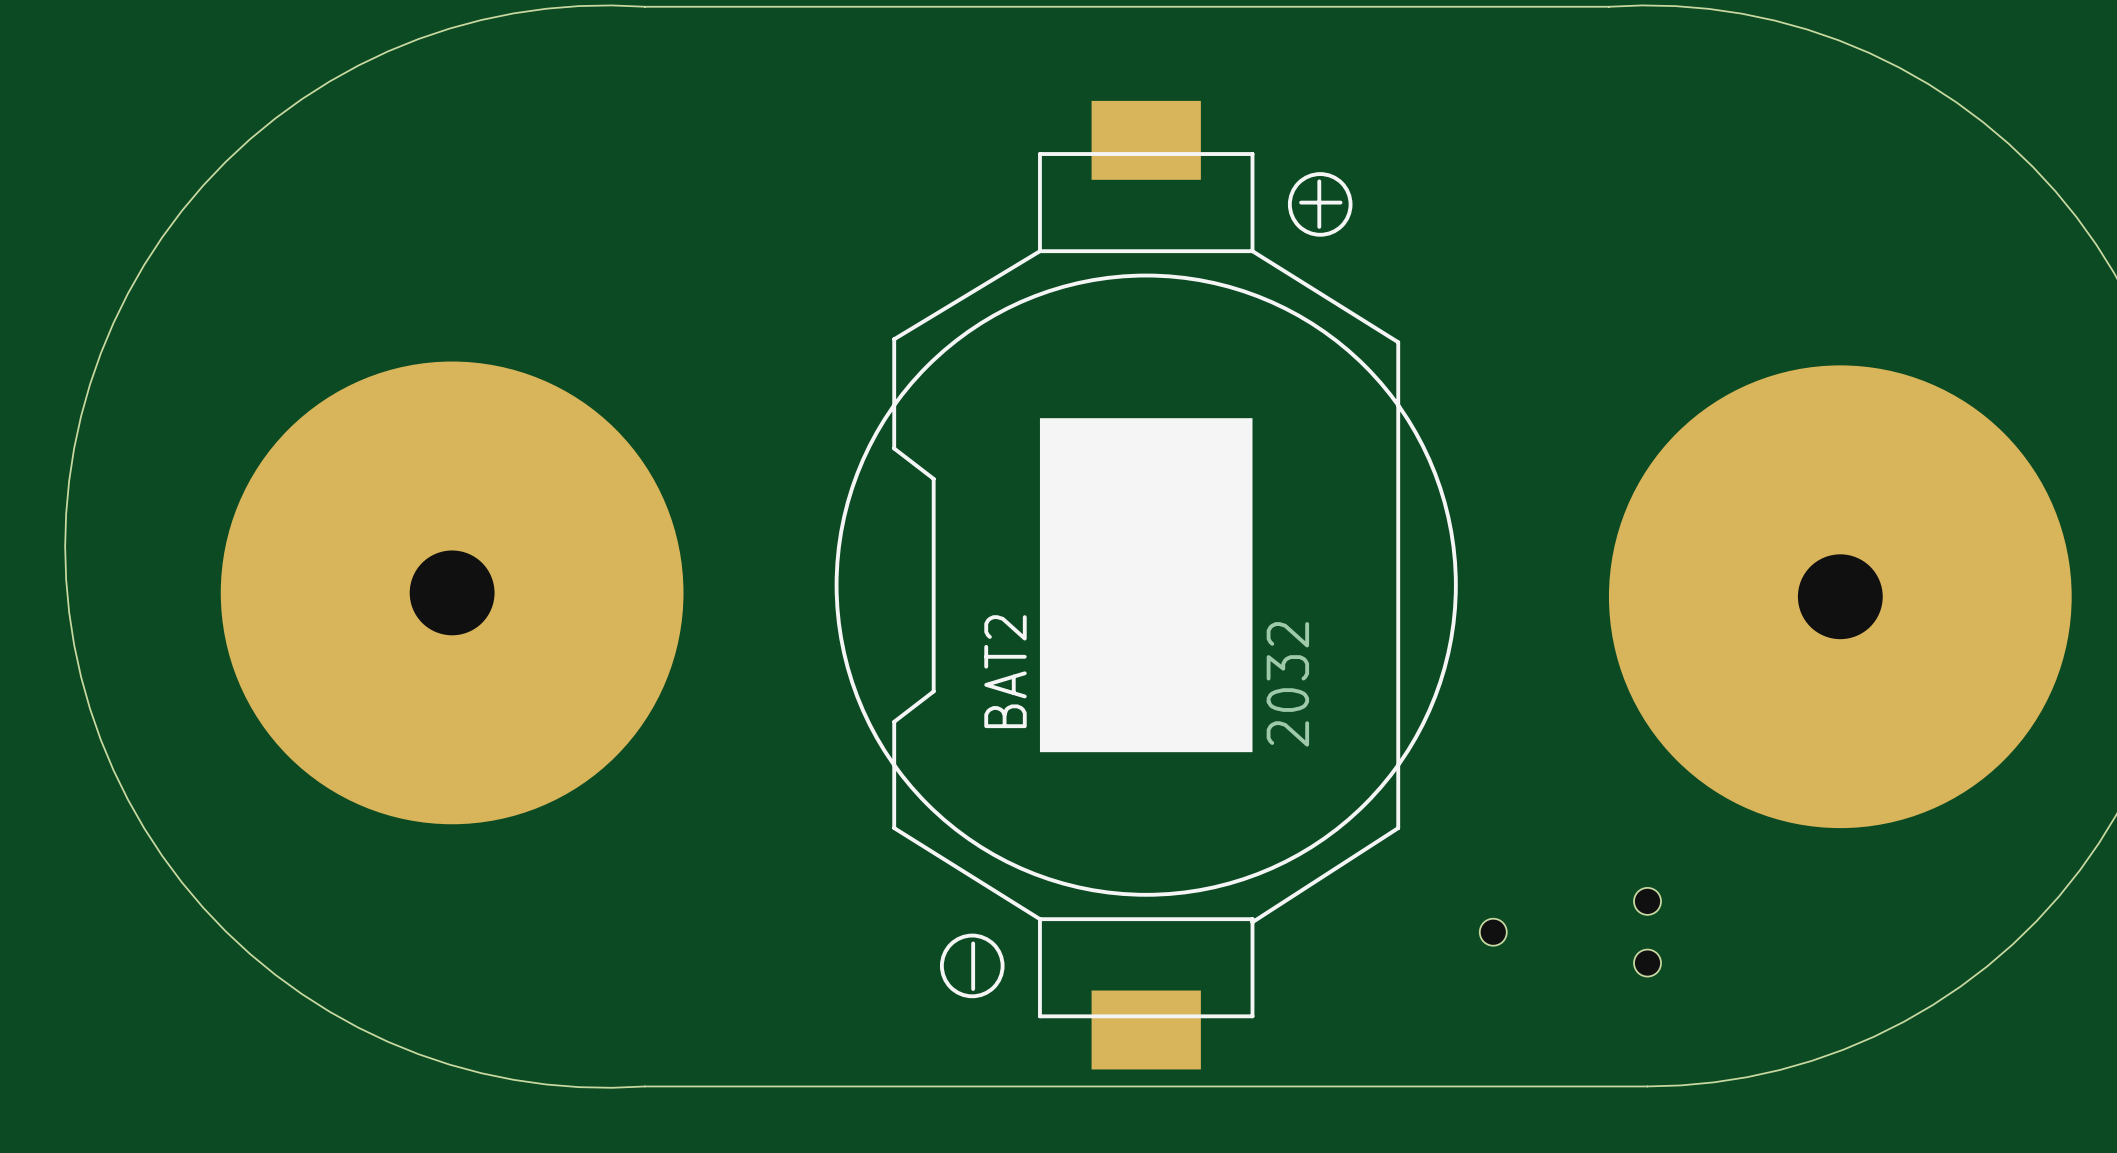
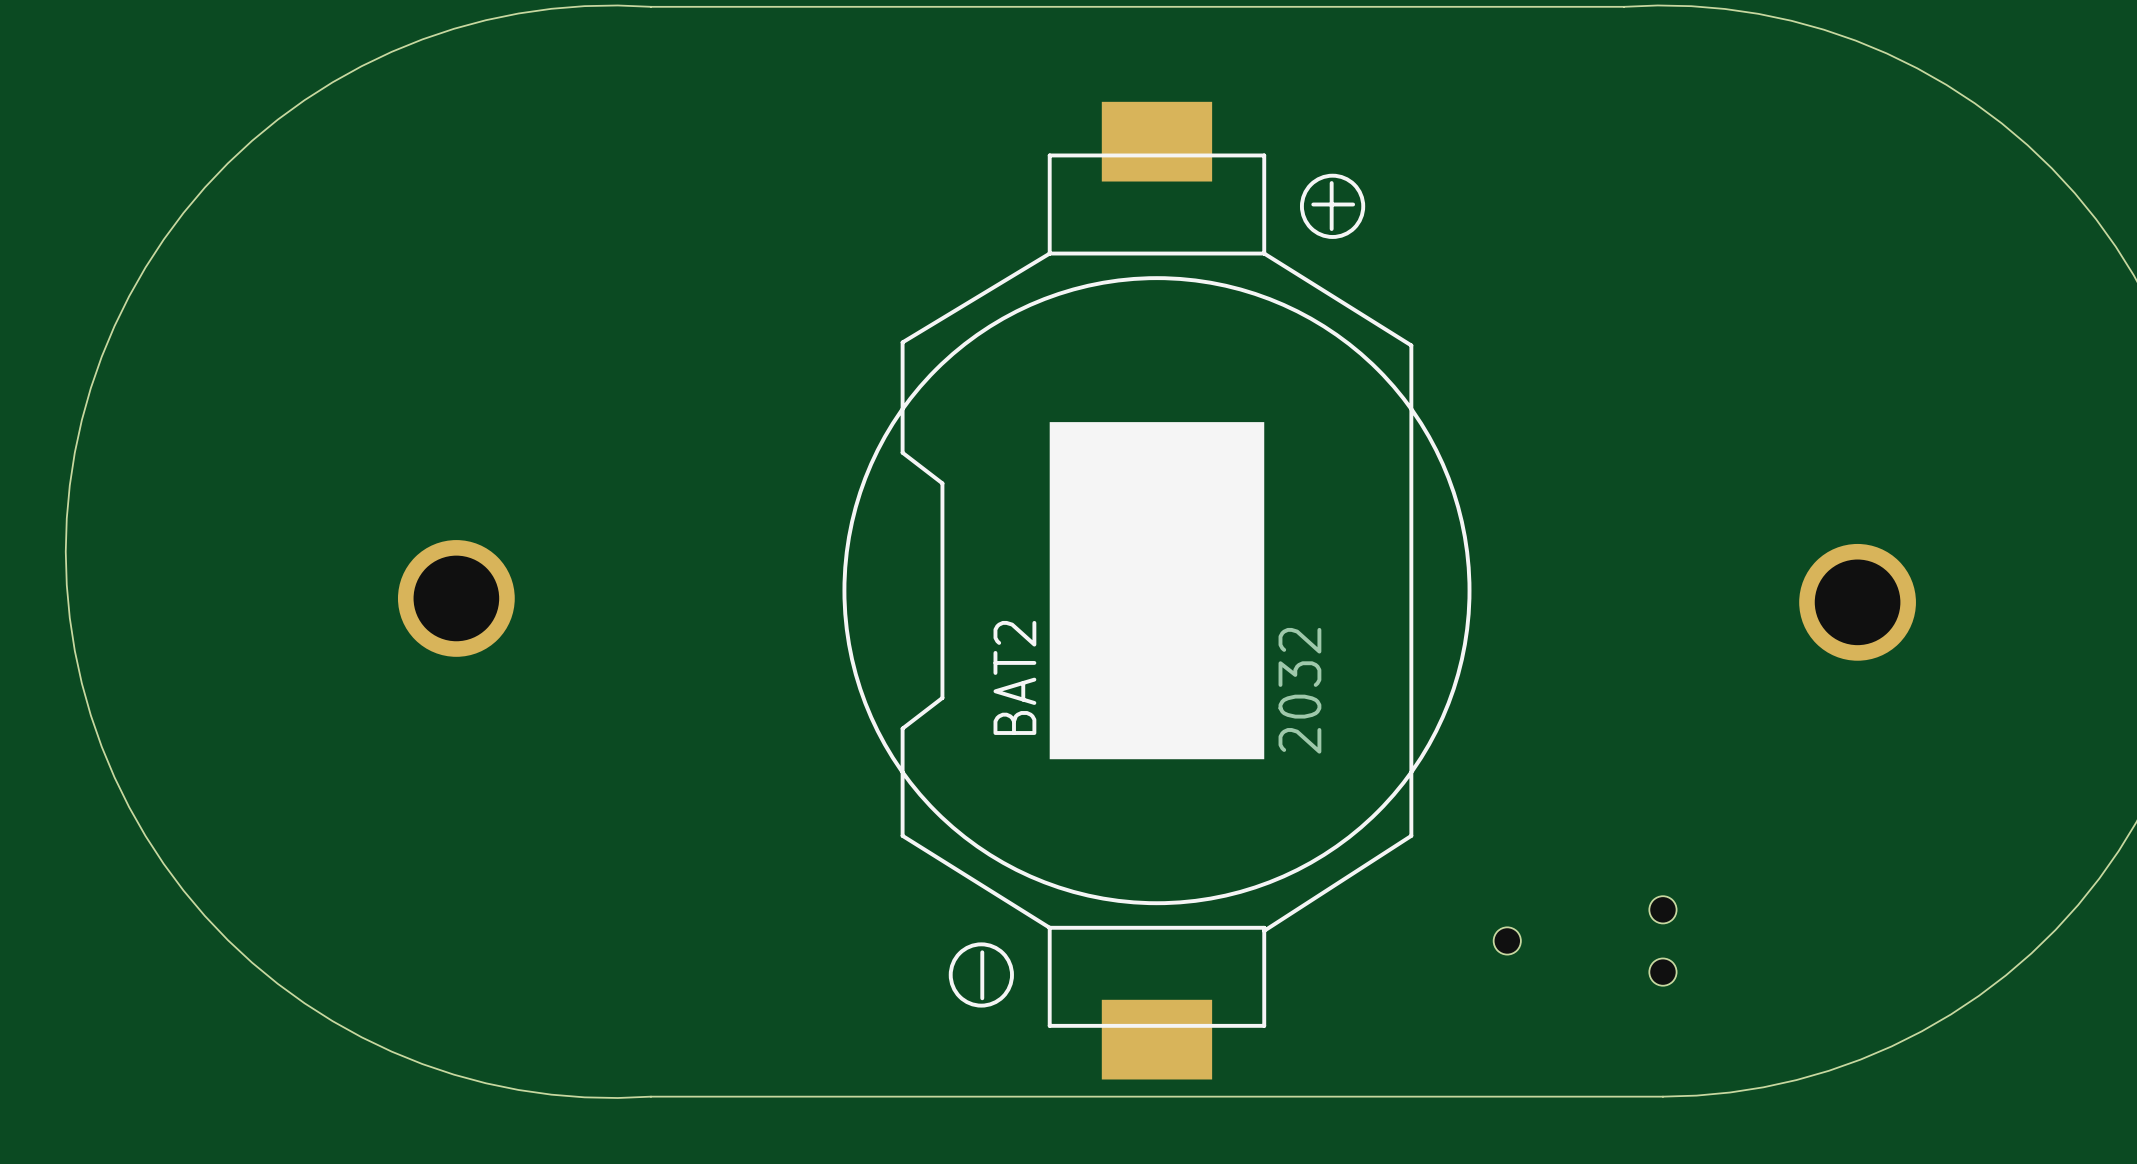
part footprint: [220, 361, 684, 825] -> [397, 540, 515, 657]
part footprint: [1608, 365, 2072, 829] -> [1799, 543, 1916, 661]

